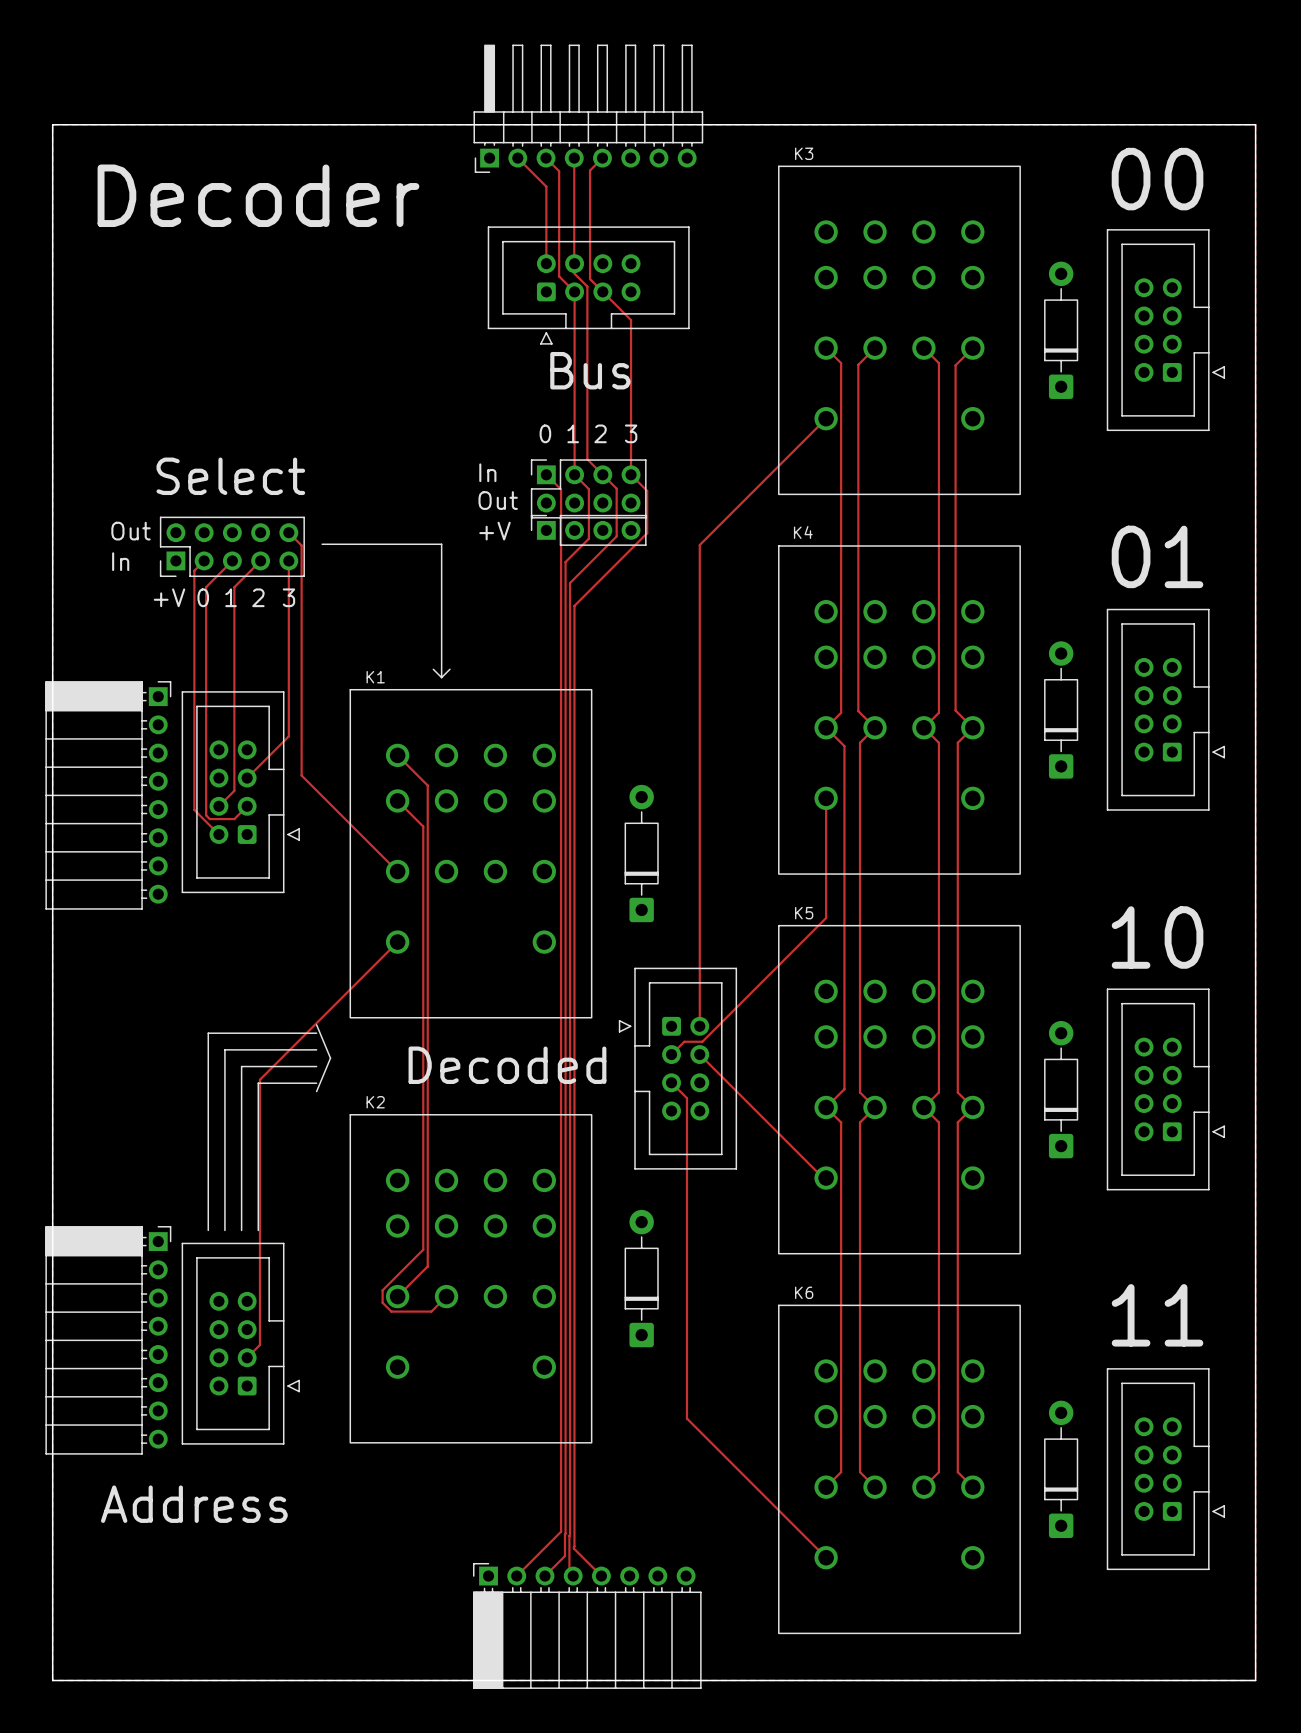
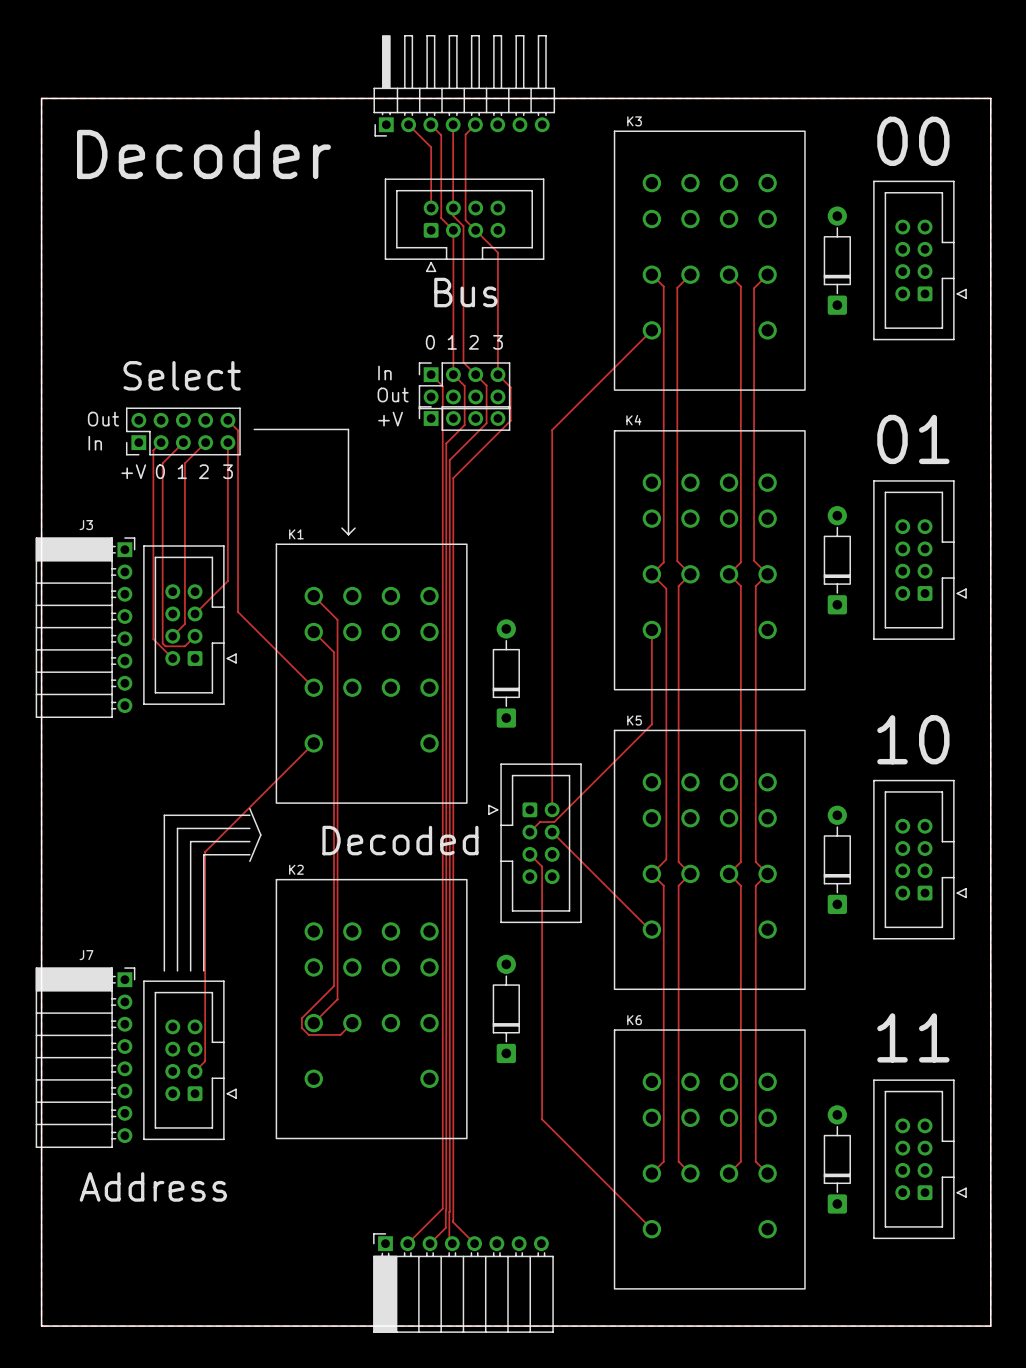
J3 name: none -> J3 (86, 525)
J7 name: none -> J7 (86, 955)

